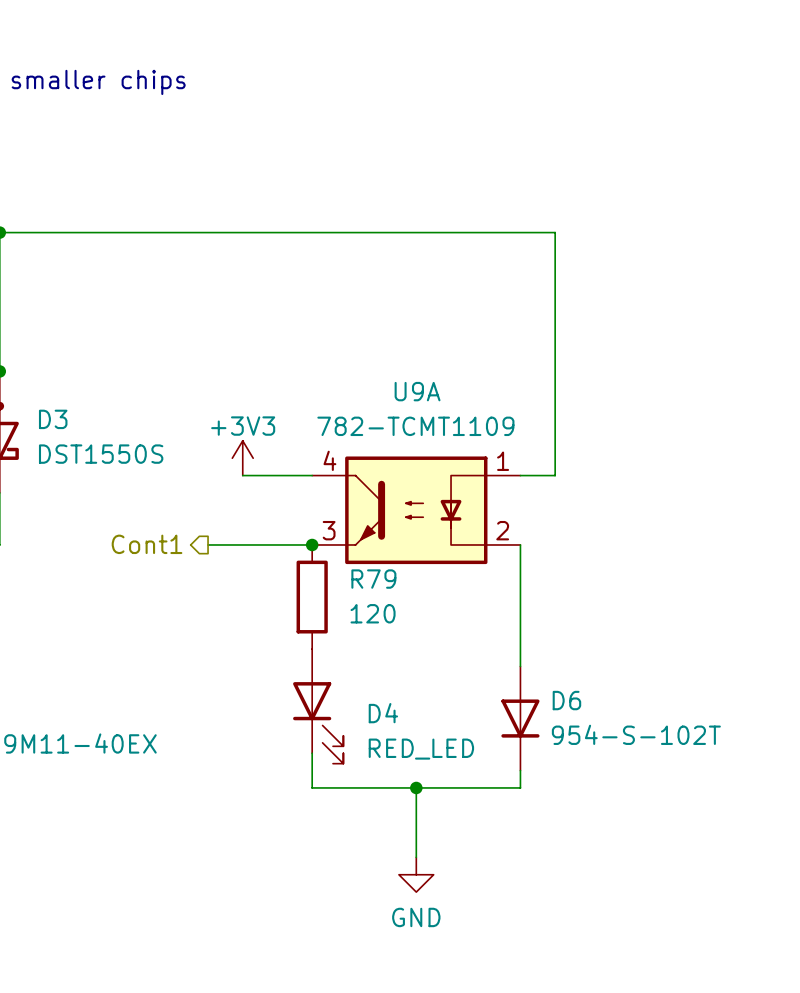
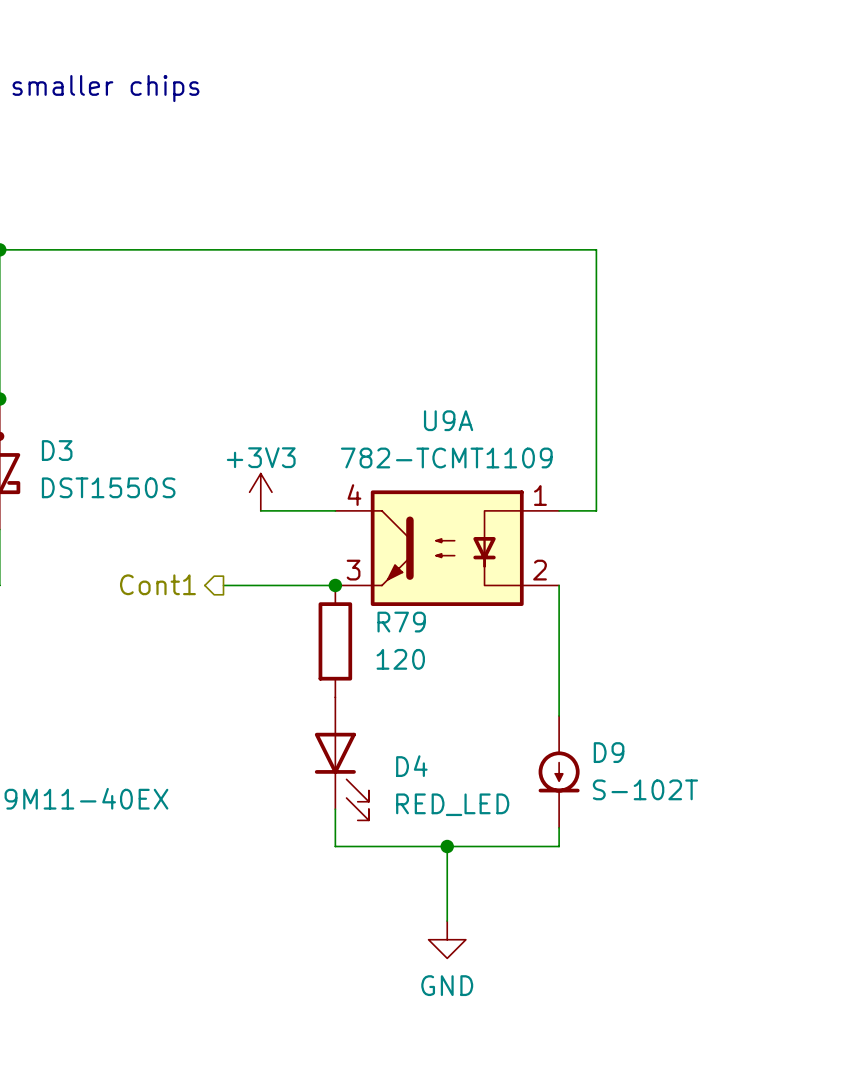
D6: 954-S-102T (520, 718) -> none
D9: none -> S-102T (559, 771)

